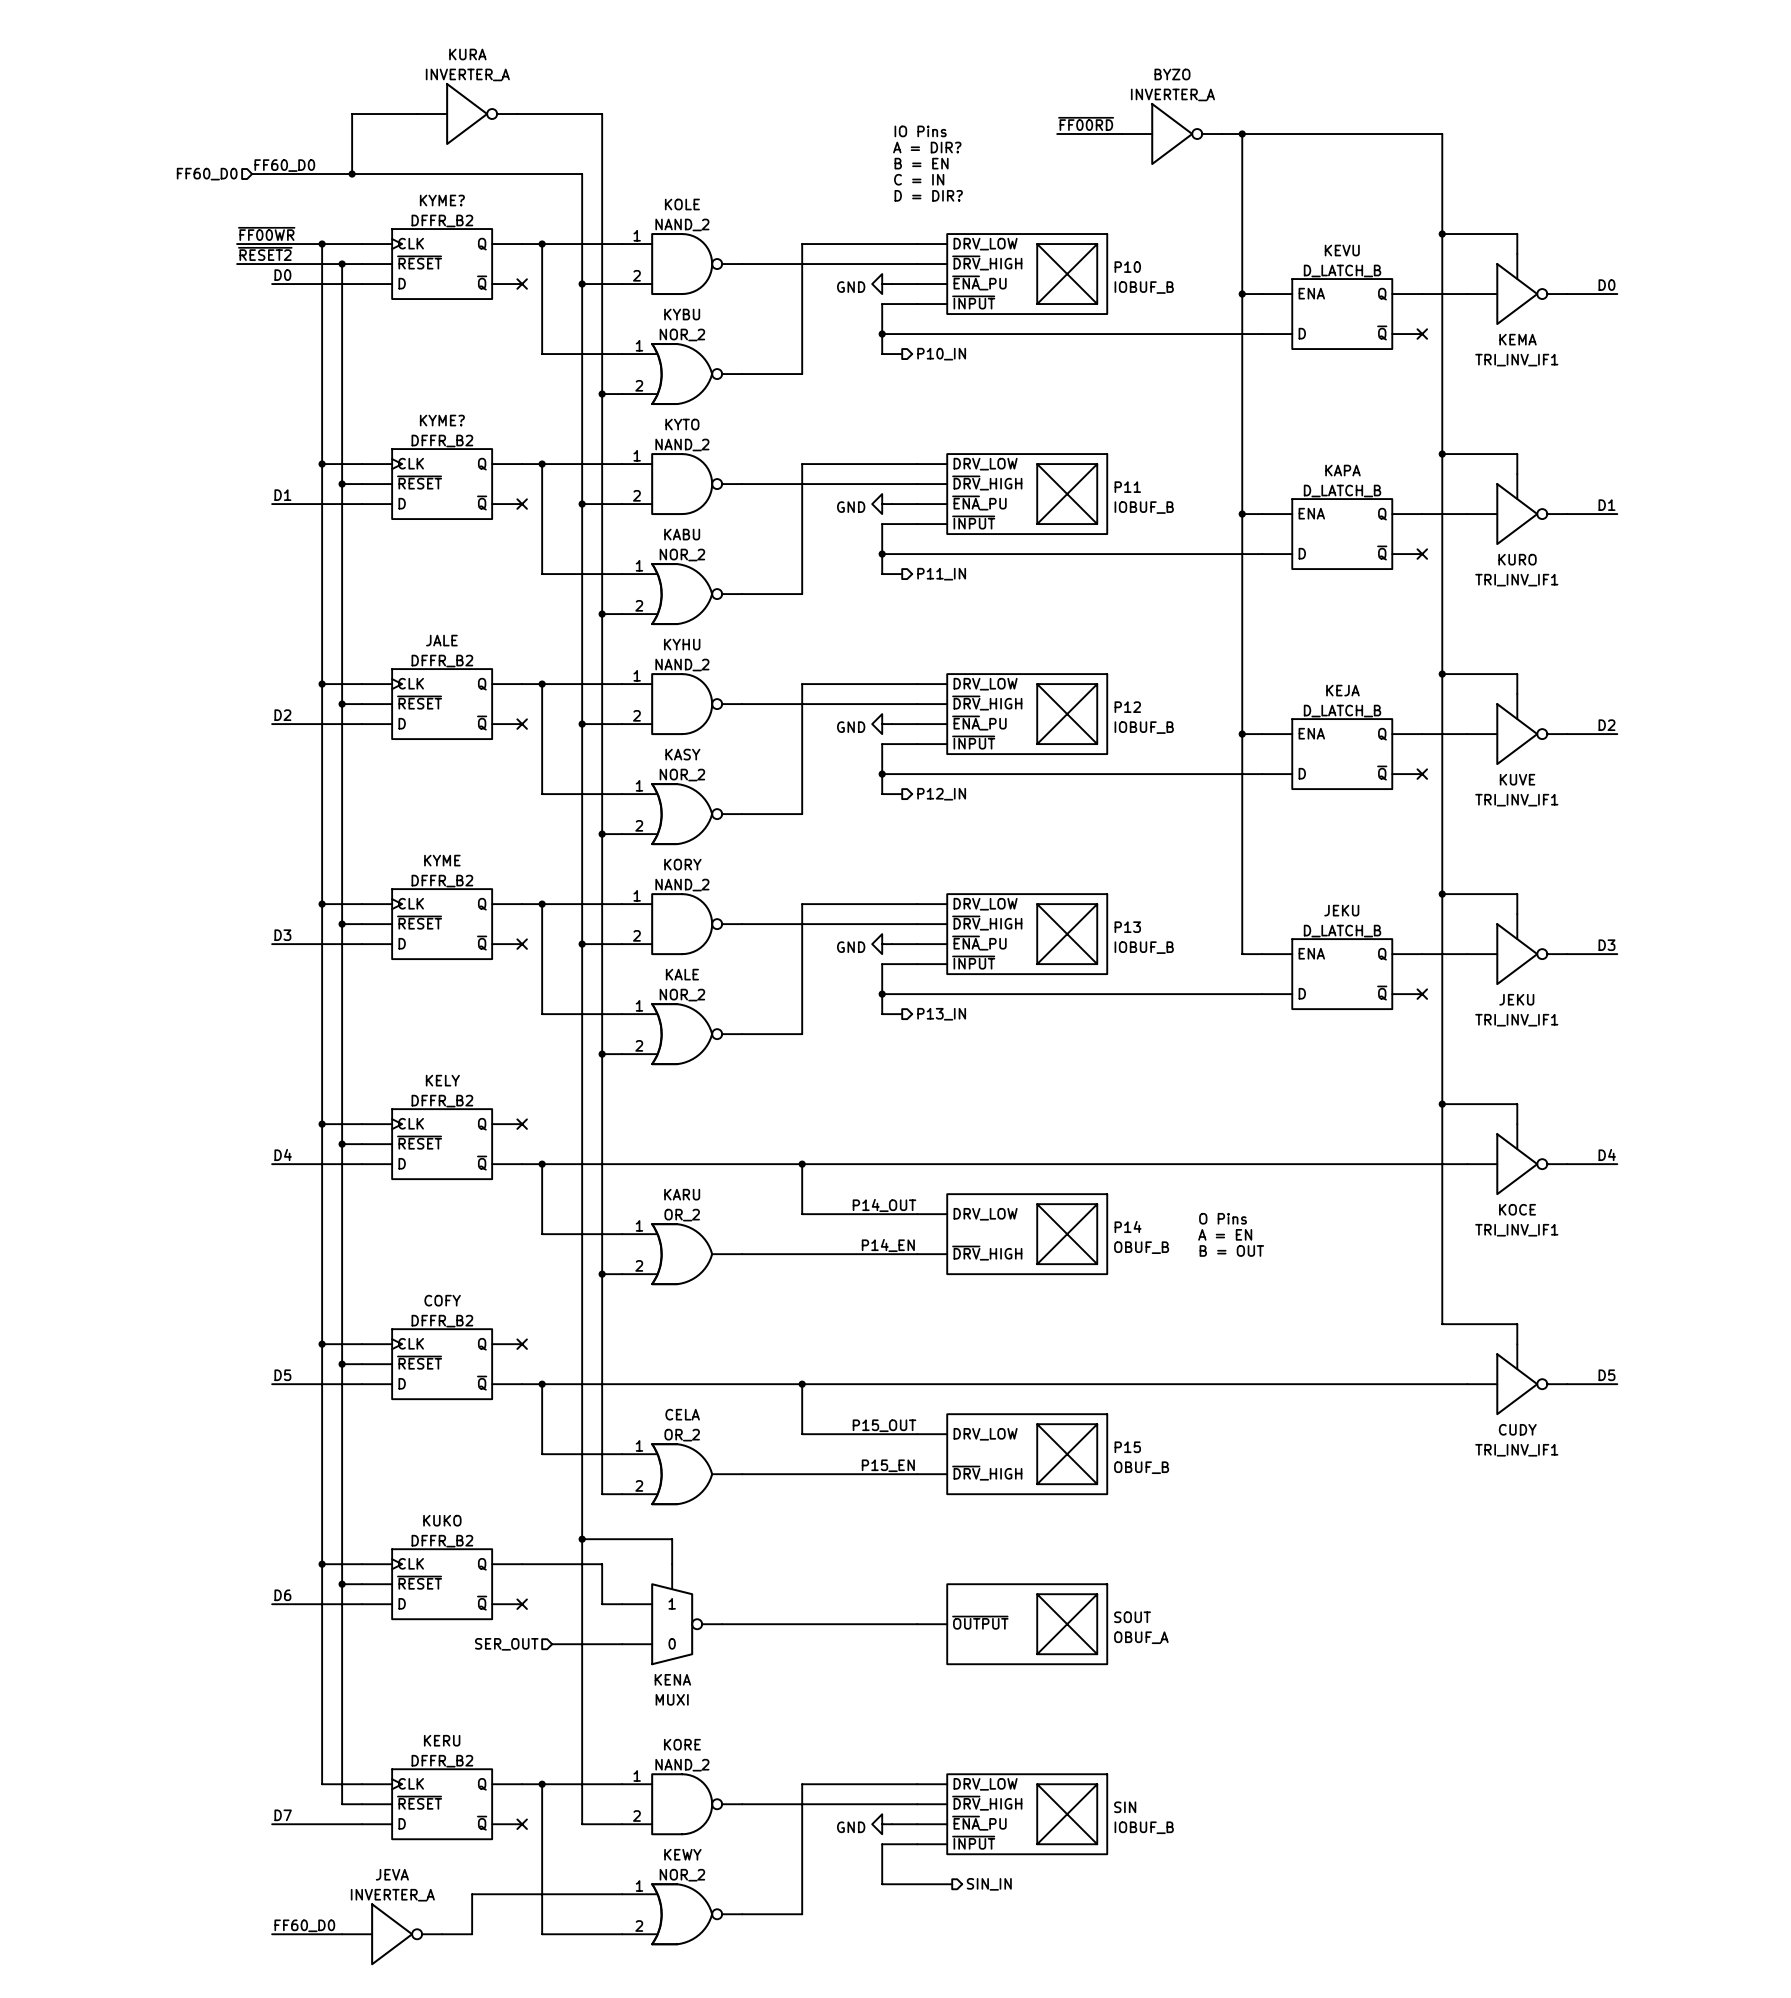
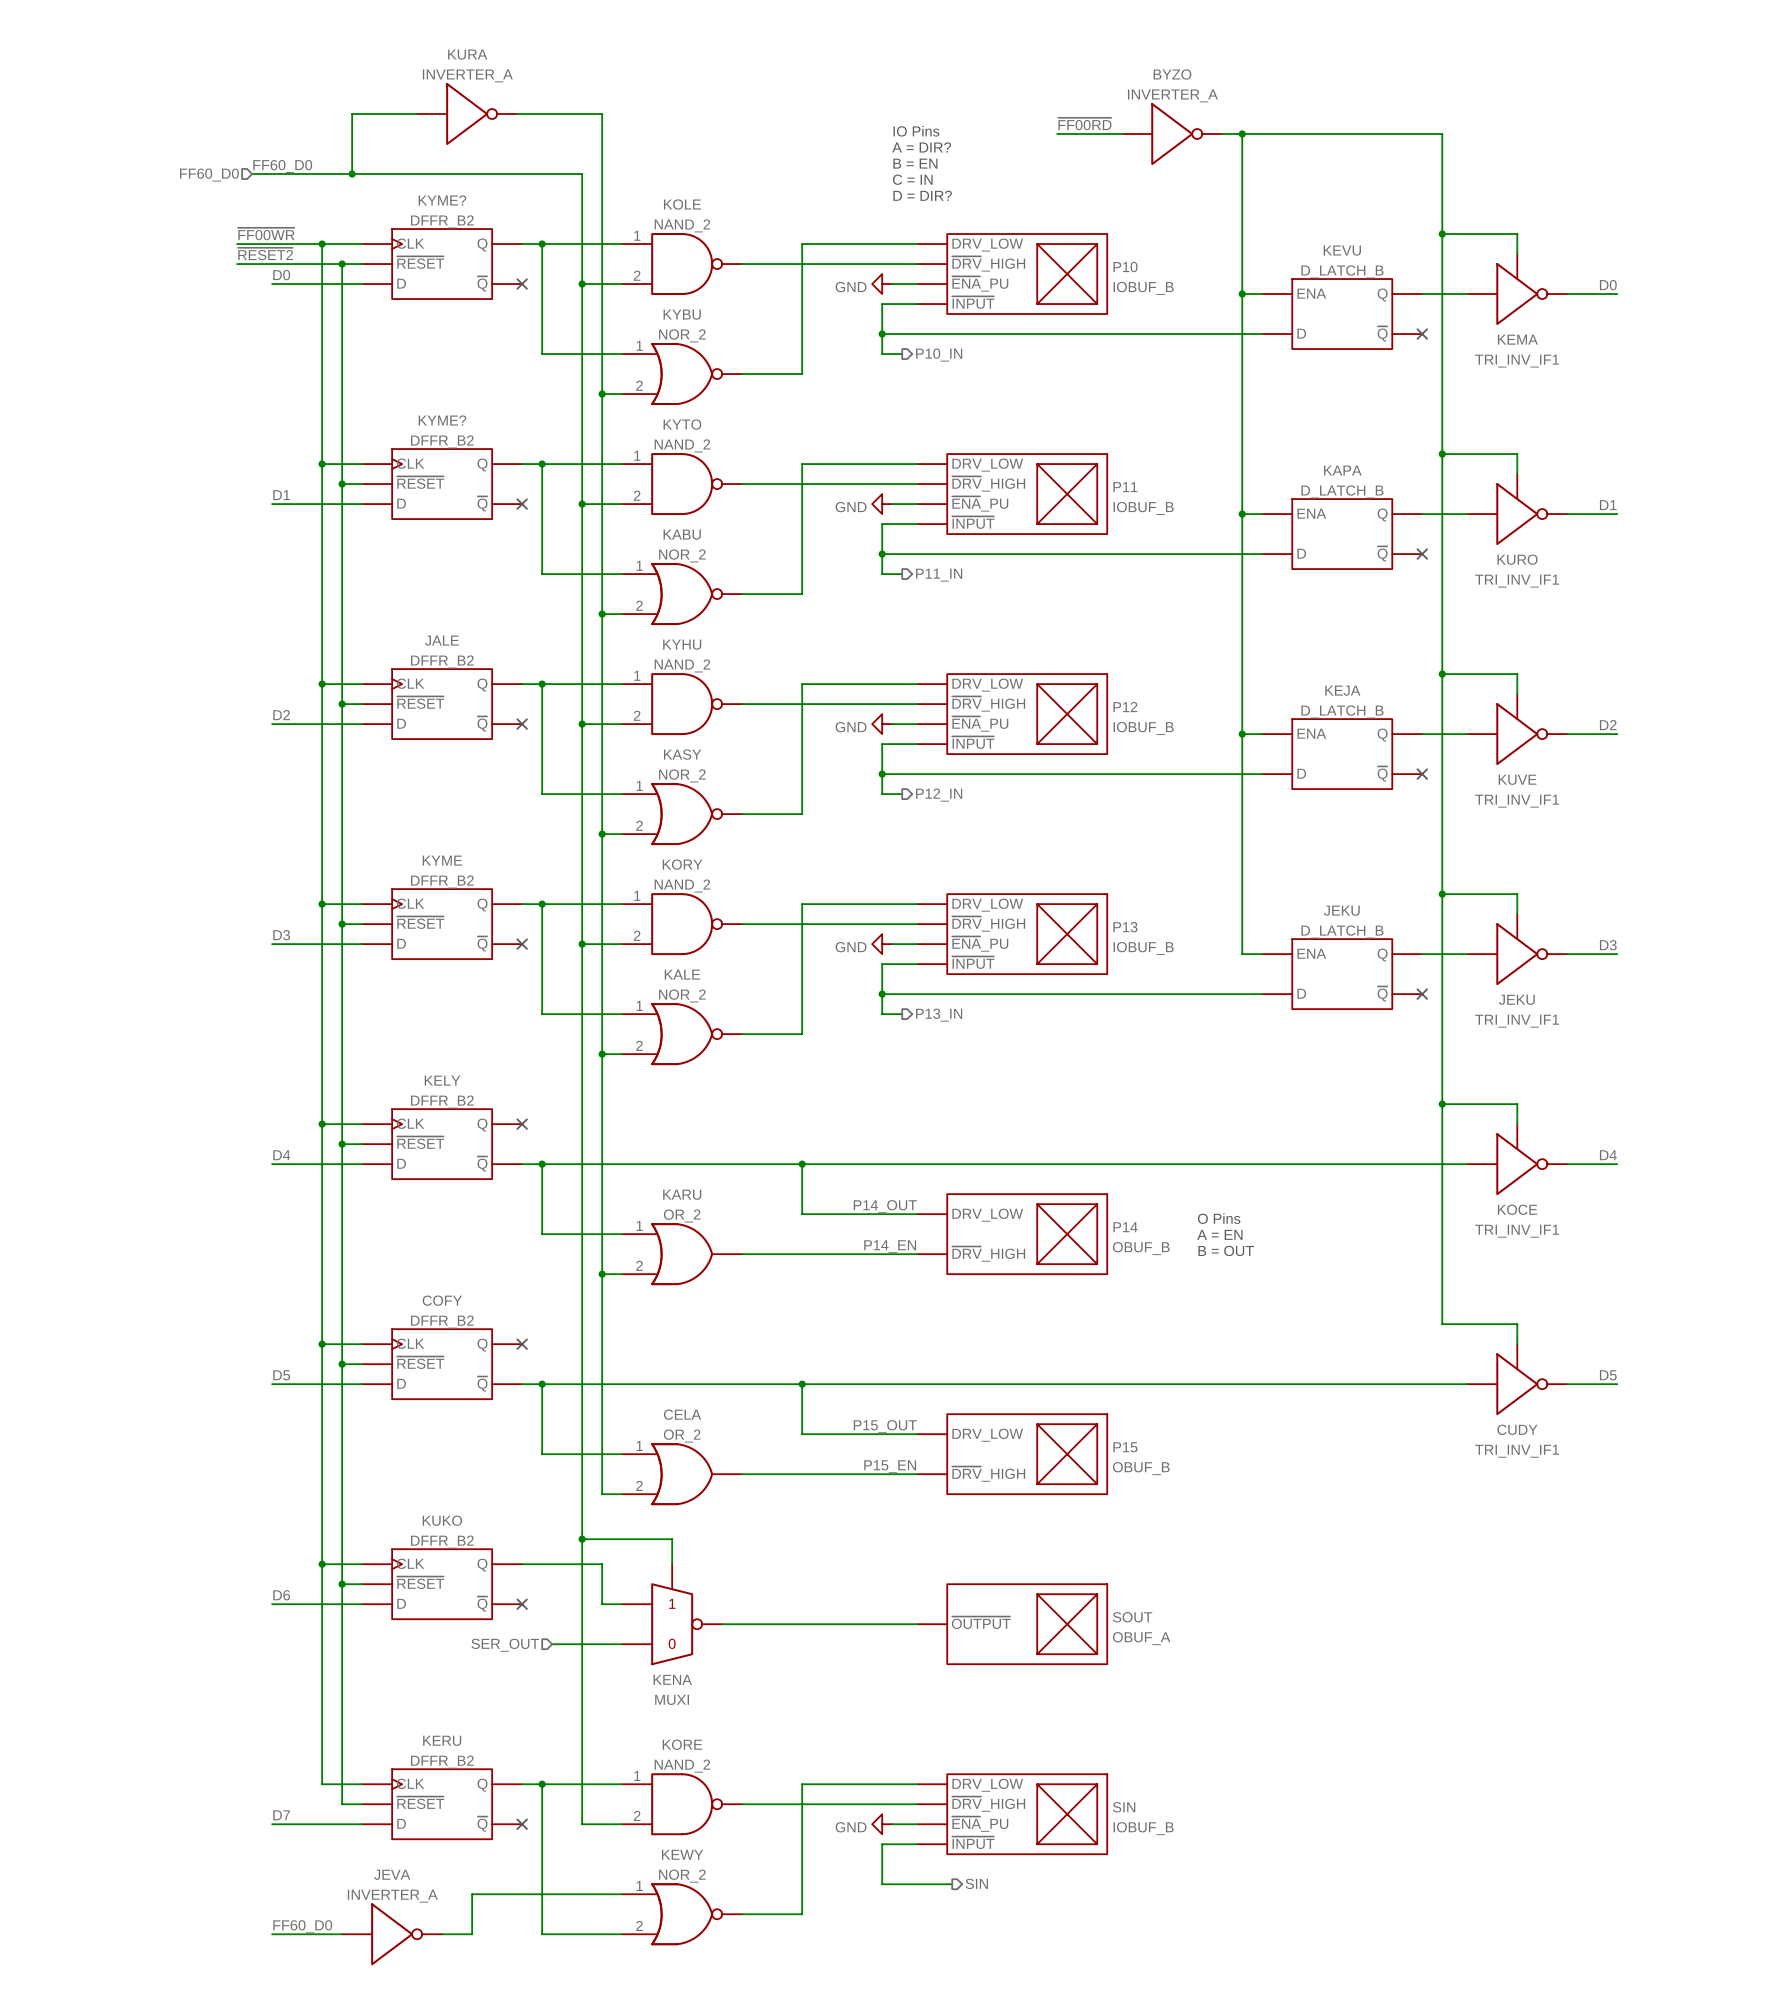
hierarchical label: SIN_IN (989, 1884) -> SIN (976, 1883)

